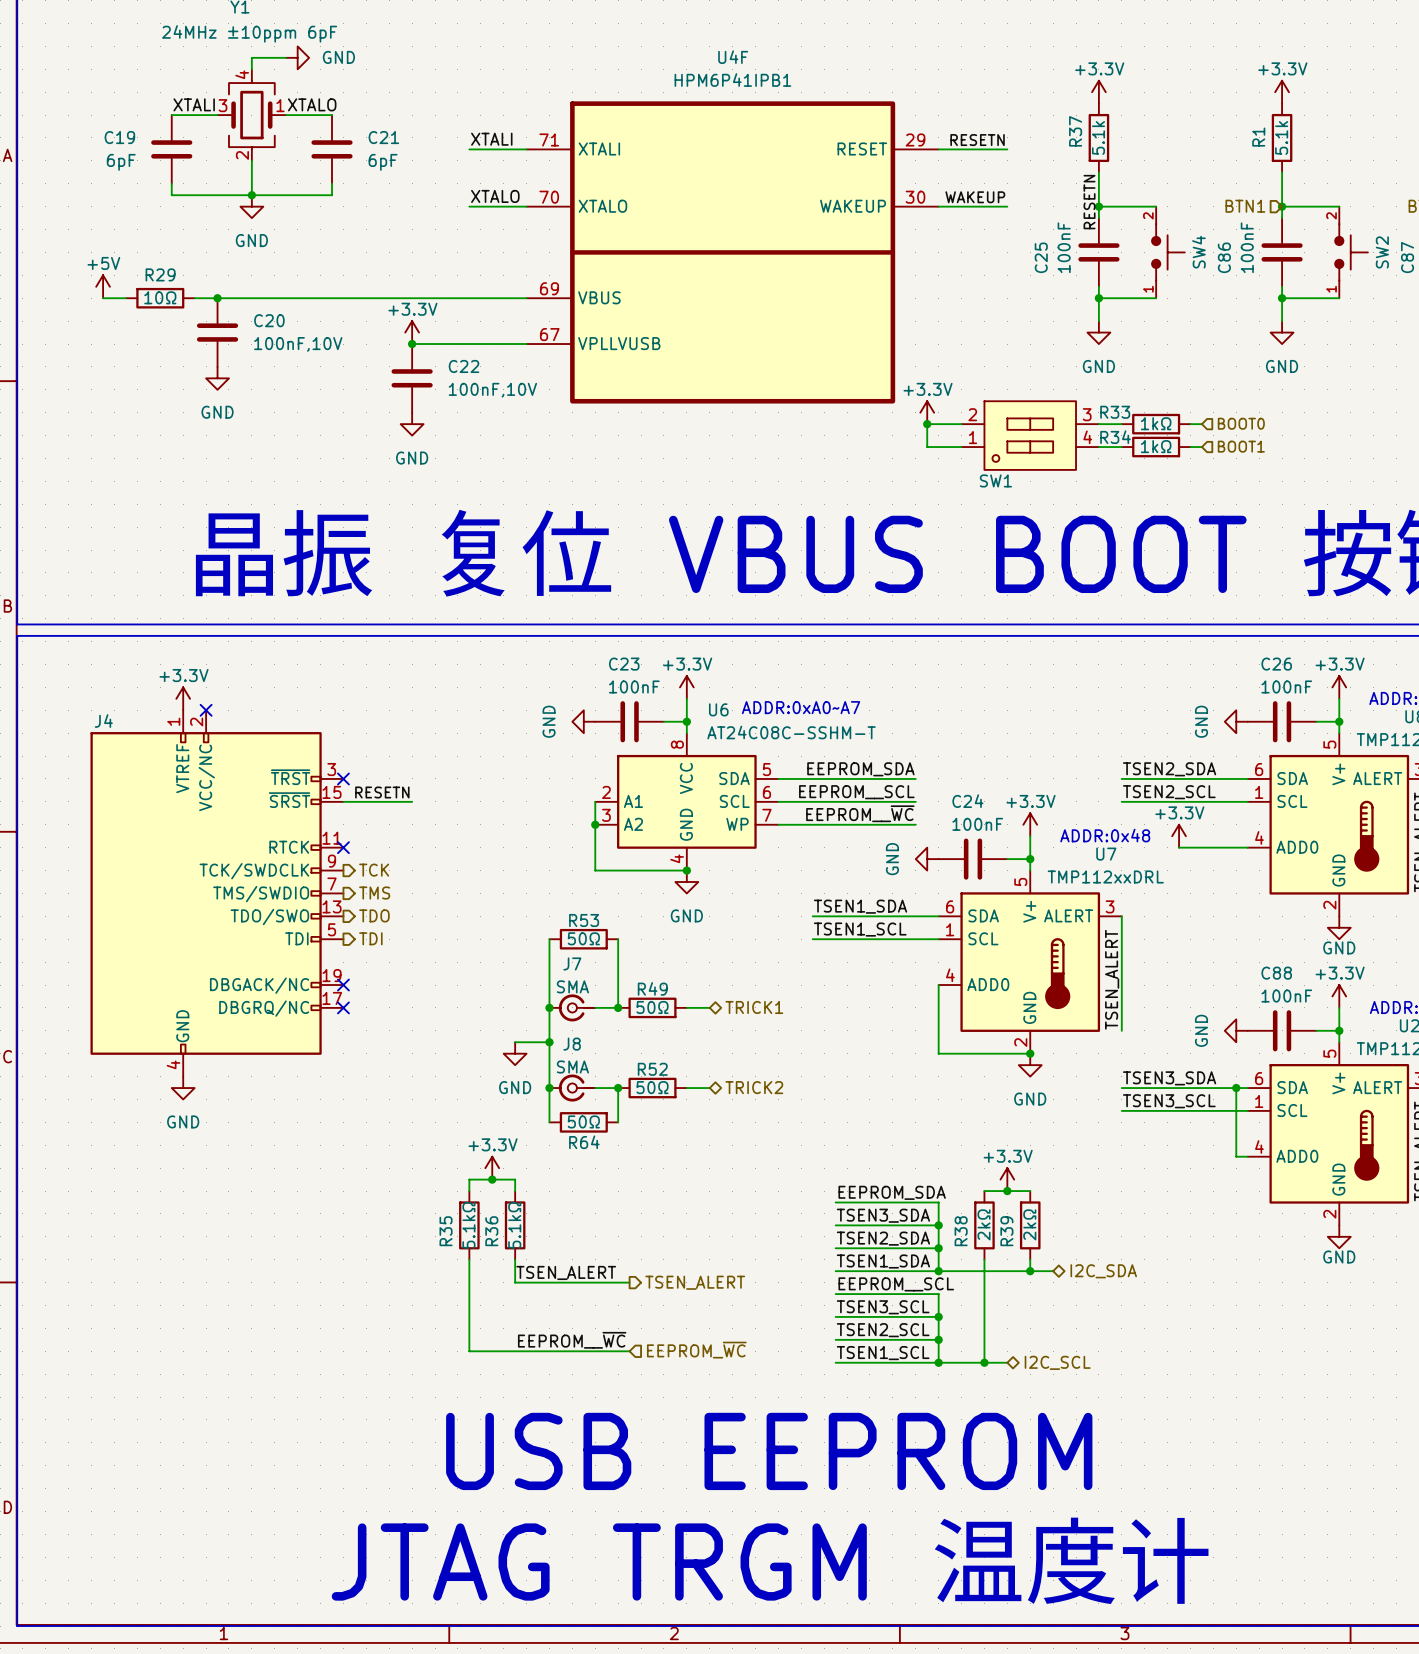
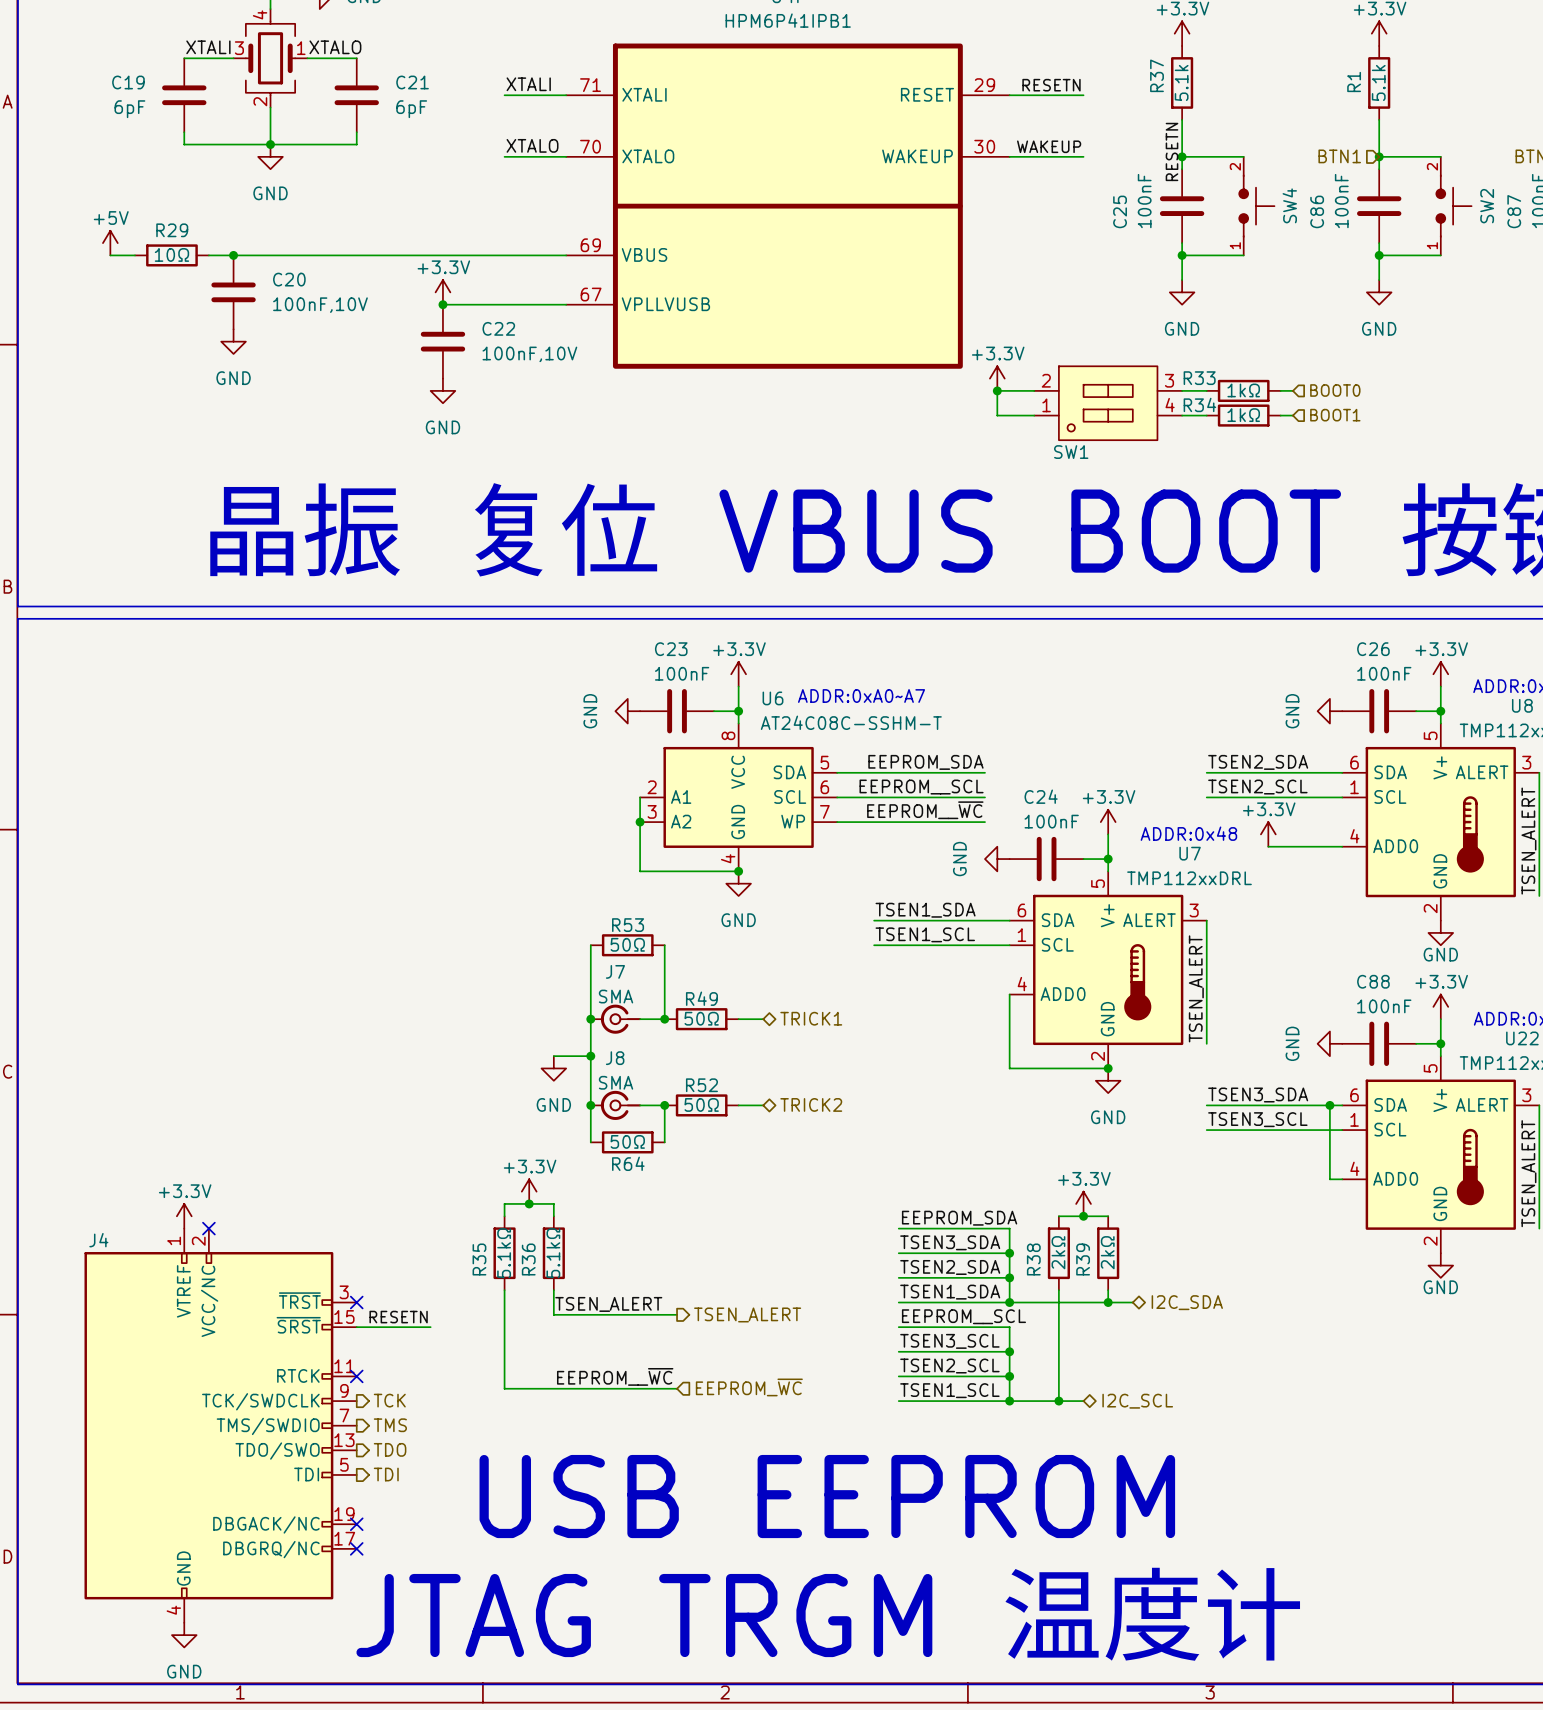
power symbol: +3.3V (183, 698) -> none
no-connect mark: (206, 710) -> none
no-connect mark: (343, 778) -> none
label: RESETN (382, 792) -> none
wire: (343, 801) (412, 801) -> none
no-connect mark: (343, 847) -> none
hierarchical label: TCK (374, 870) -> none
J4 position: (216, 893) -> (220, 1425)
hierarchical label: TMS (374, 893) -> none
hierarchical label: TDO (374, 915) -> none
hierarchical label: TDI (370, 938) -> none
no-connect mark: (343, 985) -> none
no-connect mark: (343, 1007) -> none
power symbol: GND (183, 1088) -> none
power symbol: none -> +3.3V (184, 1216)
no-connect mark: none -> (208, 1228)
no-connect mark: none -> (356, 1302)
label: none -> RESETN (398, 1317)
wire: none -> (356, 1327) (430, 1327)
no-connect mark: none -> (356, 1376)
hierarchical label: none -> TCK (389, 1400)
hierarchical label: none -> TMS (390, 1425)
hierarchical label: none -> TDO (390, 1449)
hierarchical label: none -> TDI (386, 1474)
no-connect mark: none -> (356, 1524)
no-connect mark: none -> (356, 1548)
power symbol: none -> GND (184, 1635)

